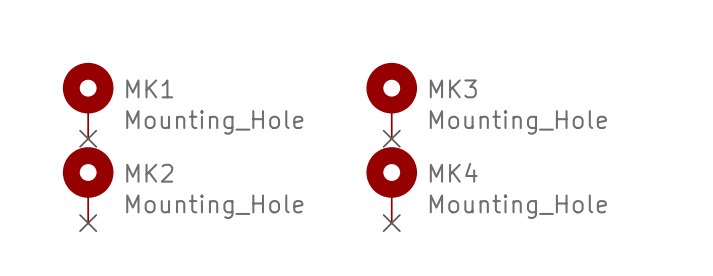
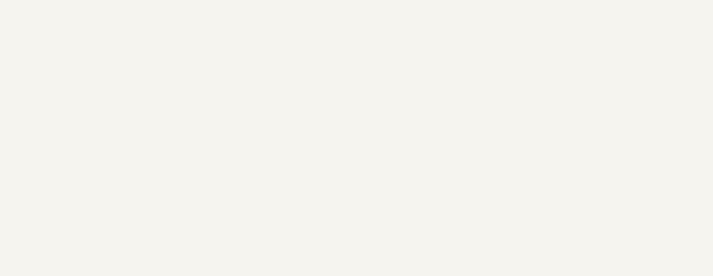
MK1: Mounting_Hole (88, 100) -> none
MK3: Mounting_Hole (391, 100) -> none
no-connect mark: (88, 138) -> none
no-connect mark: (391, 138) -> none
MK2: Mounting_Hole (88, 185) -> none
MK4: Mounting_Hole (391, 185) -> none
no-connect mark: (88, 223) -> none
no-connect mark: (391, 223) -> none

